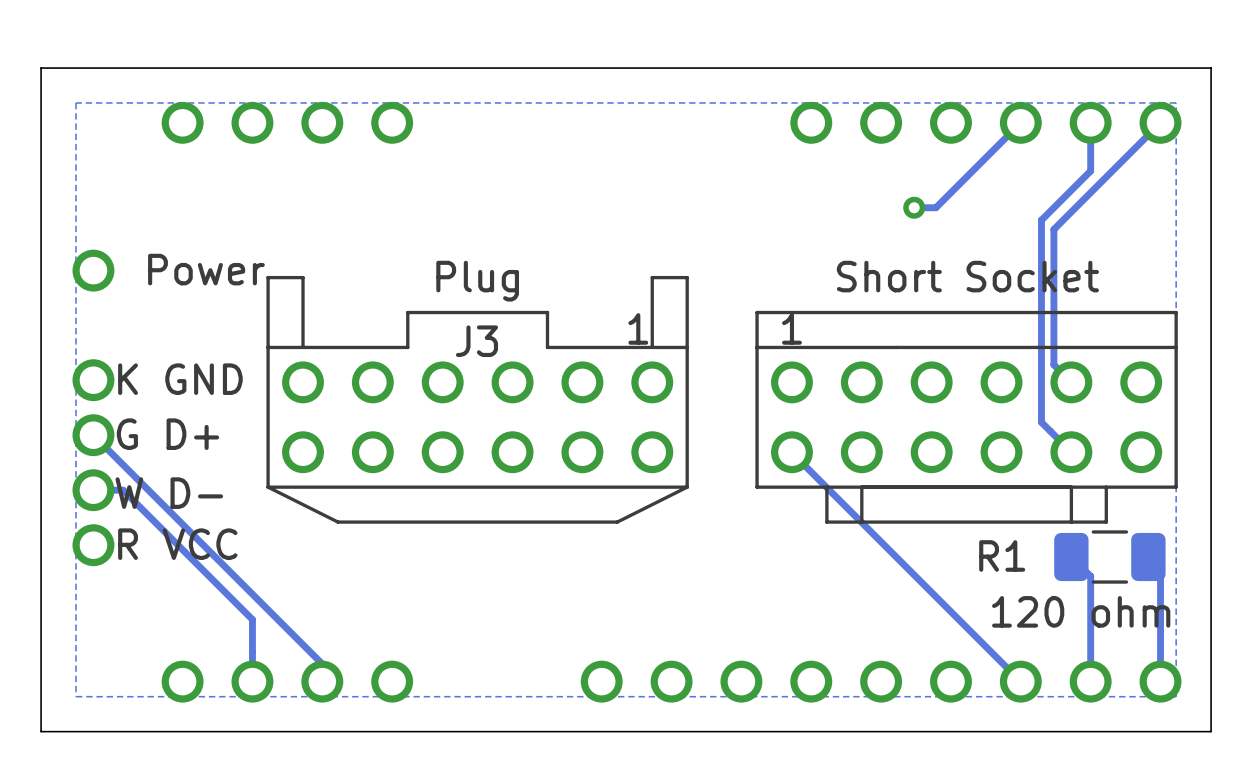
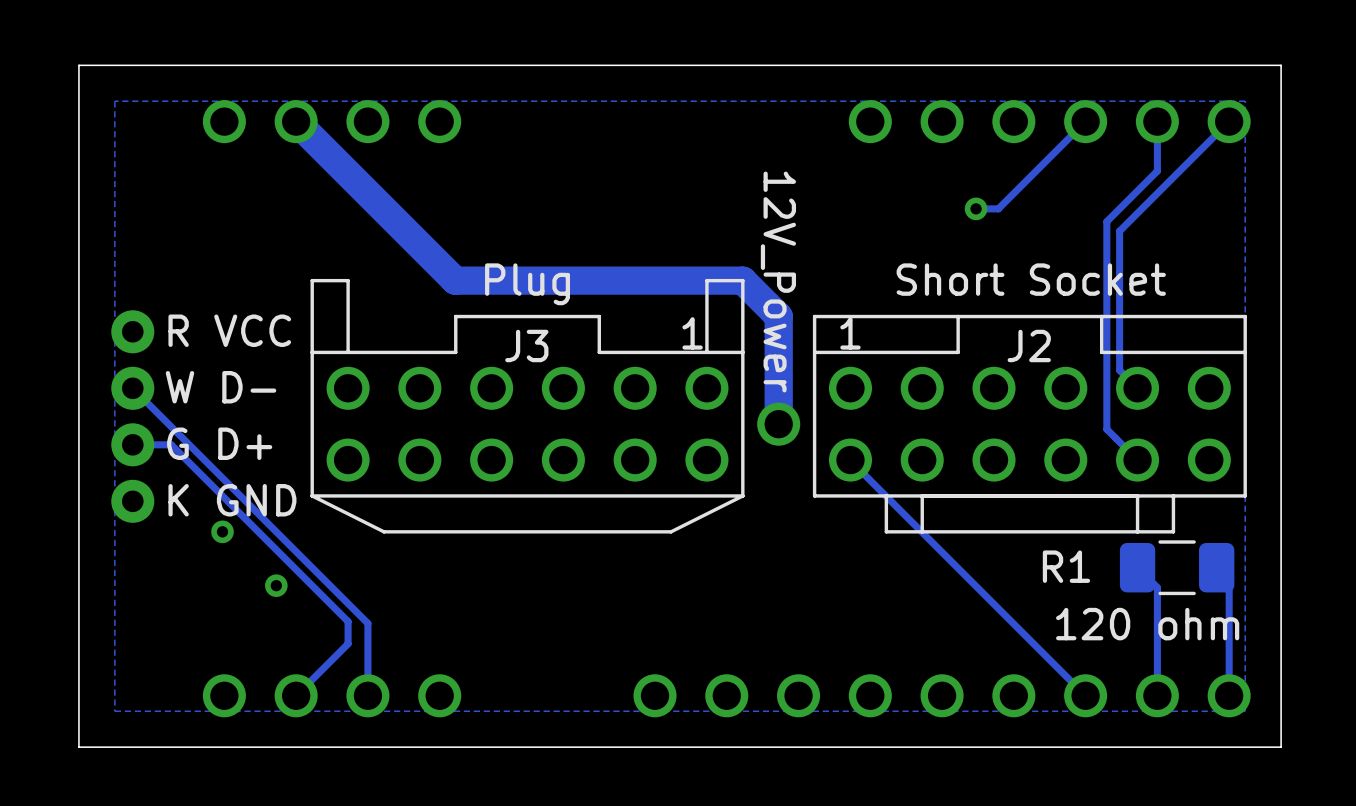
track: none -> (296, 121) (455, 280) (742, 280) (778, 316) (778, 424)
part: Power (93, 270) -> none
part: none -> (132, 416)
part: none -> 12V_Power (778, 424)
part: (966, 417) -> none
J2: none -> (1029, 424)
track: (93, 435) (322, 664) -> (132, 388) (367, 623) (367, 677)
part: (93, 462) -> none
track: (93, 490) (123, 490) (252, 619) (252, 681) -> (132, 444) (171, 444) (348, 621) (348, 643) (296, 695)
via: none -> (222, 531)
via: none -> (276, 585)

